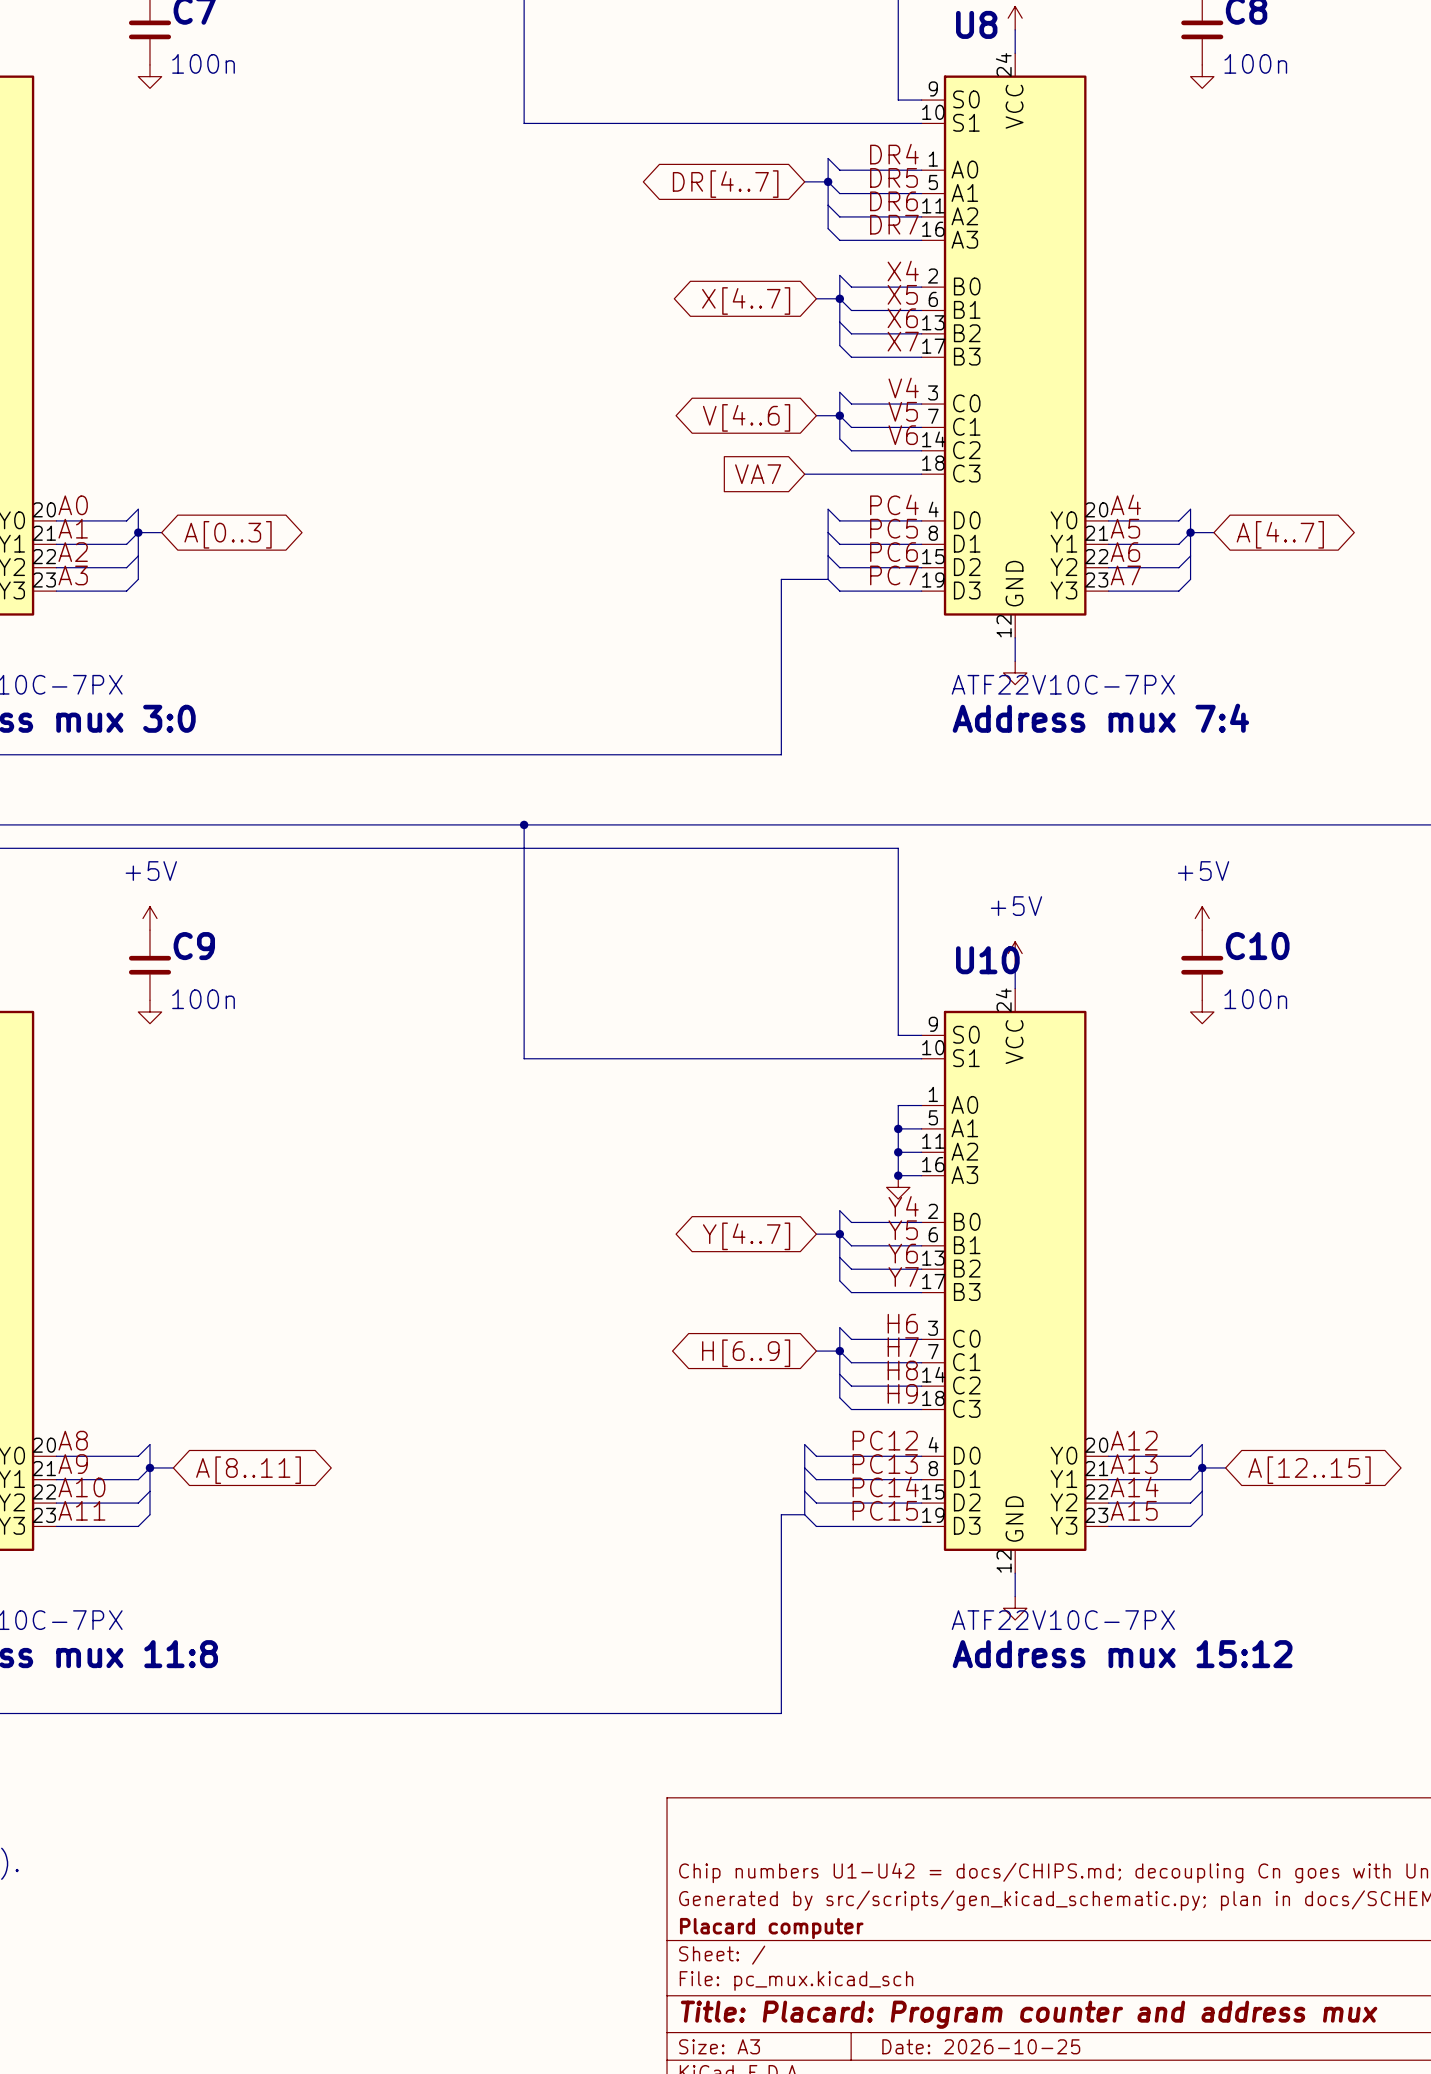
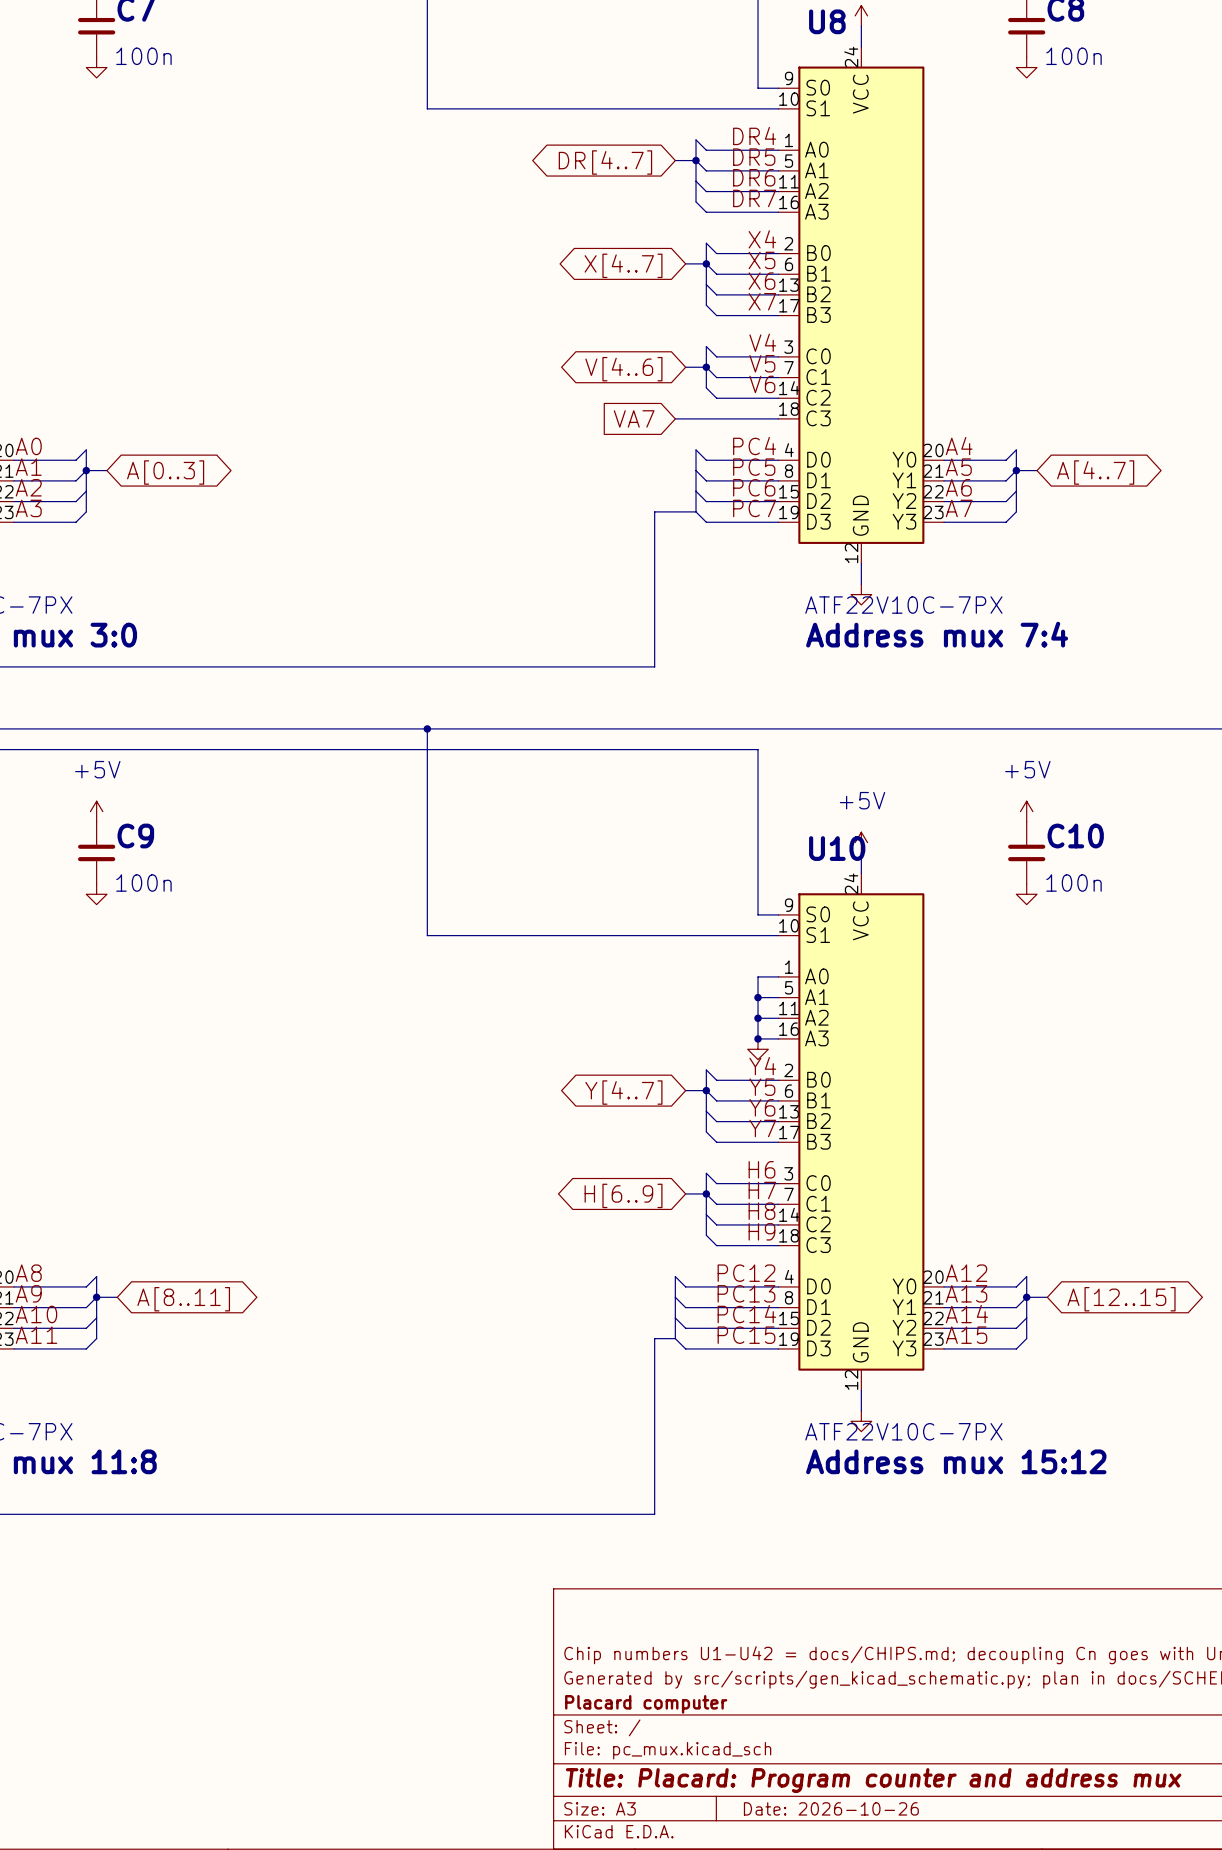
title block: Date: 2026-10-25 (981, 2046) -> Date: 2026-10-26 (831, 1808)

